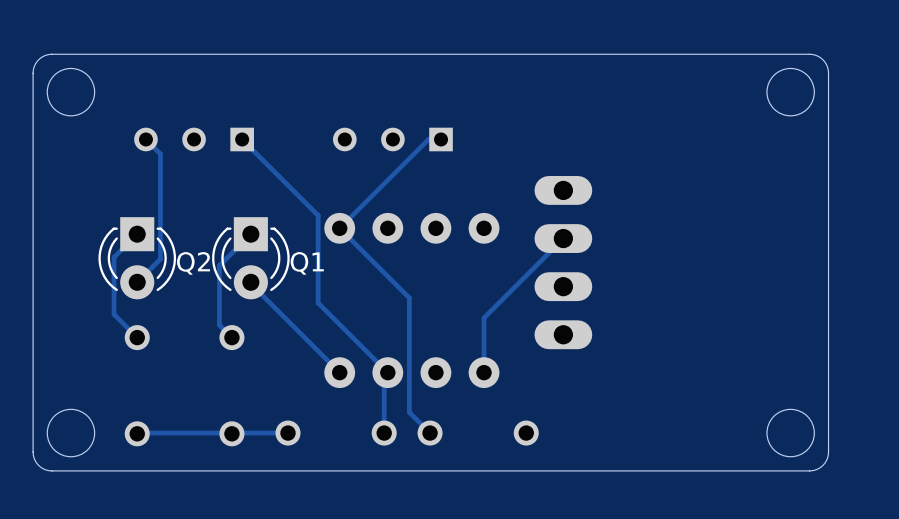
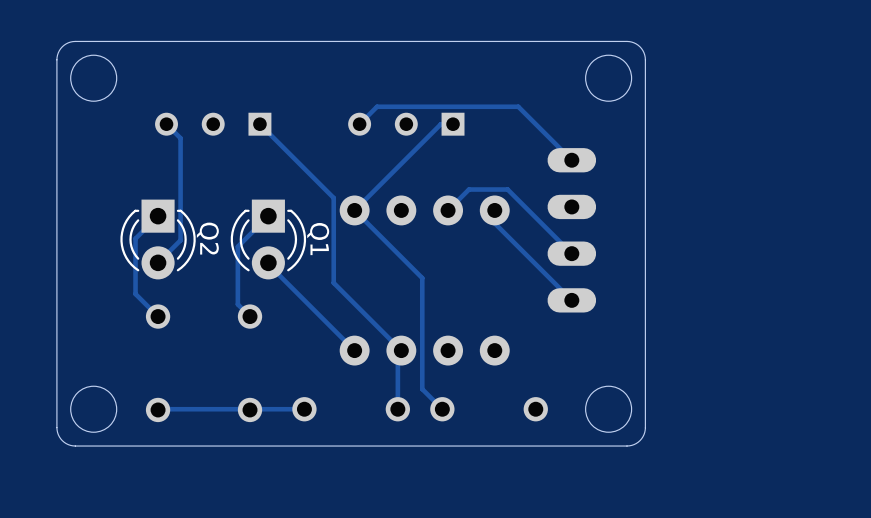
board edge: (620, 54) (812, 54) (822, 59) (828, 73) (828, 451) (826, 461) (819, 468) (809, 470) (620, 470) -> (627, 41) (640, 46) (645, 59) (645, 427) (640, 440) (627, 446)
round board edge position: (790, 92) -> (608, 78)
track: none -> (359, 124) (377, 106) (518, 106) (571, 160)
part footprint: [534, 176, 593, 350] -> [547, 148, 597, 313]
track: none -> (448, 210) (468, 189) (507, 189) (571, 253)
track: none -> (494, 210) (494, 223) (571, 300)
track: (563, 238) (484, 317) (484, 372) -> none
Q2 name rotation: 0° (193, 263) -> 90° clockwise (207, 238)
Q1 name rotation: 0° (307, 263) -> 90° clockwise (318, 239)
round board edge position: (790, 433) -> (608, 409)

